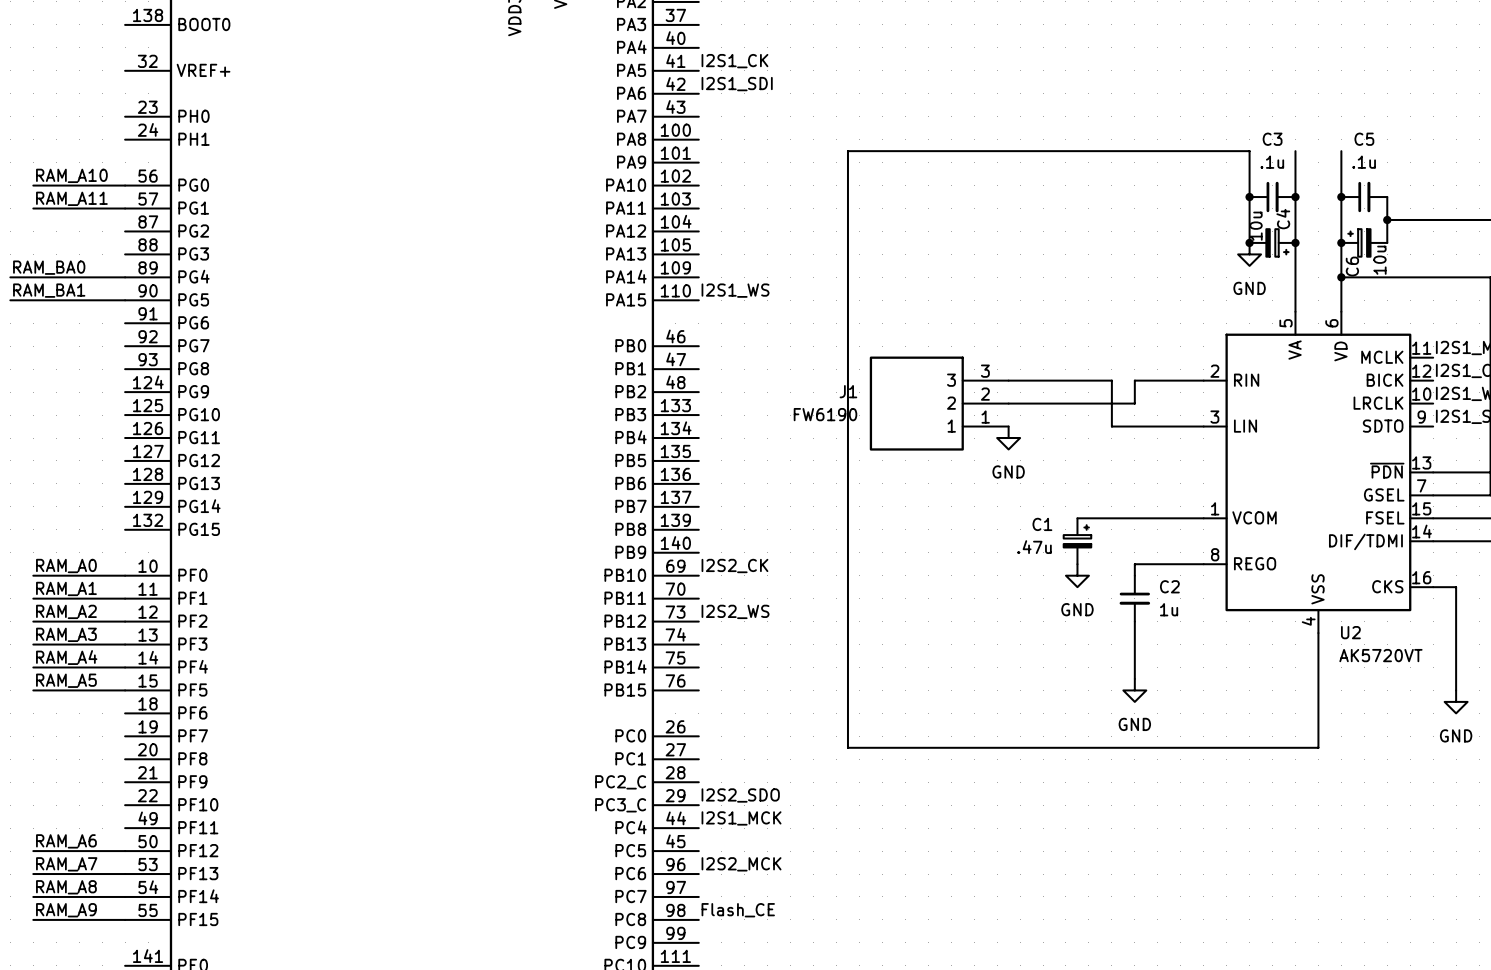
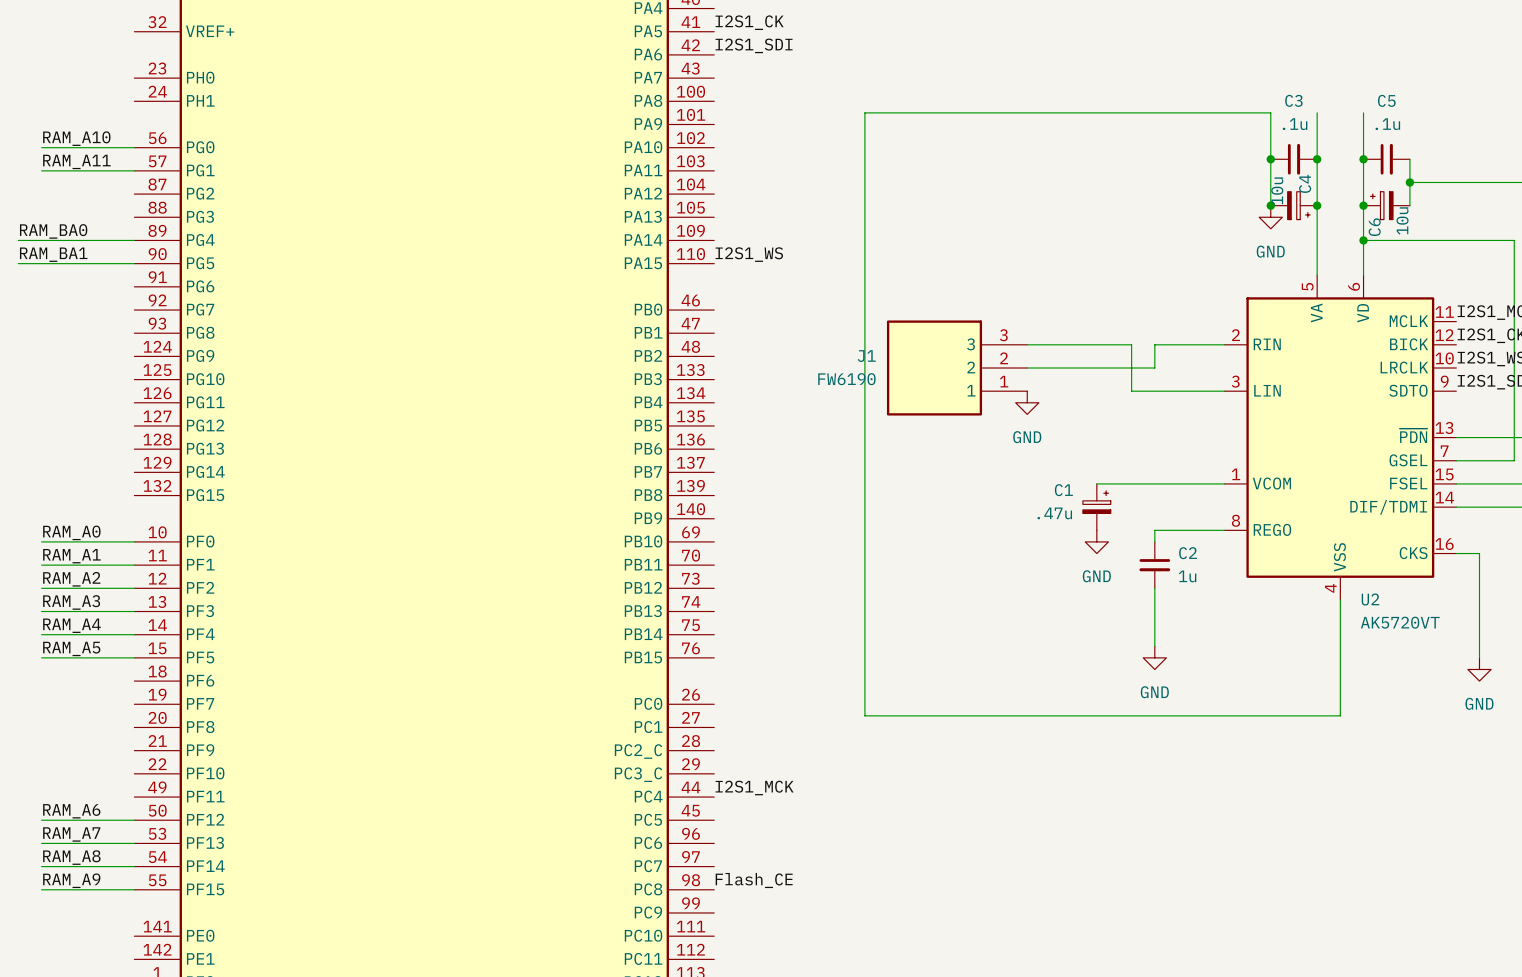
label: I2S2_CK (734, 566) -> none
label: I2S2_WS (735, 611) -> none
label: I2S2_SDO (740, 795) -> none
label: I2S2_MCK (741, 864) -> none

